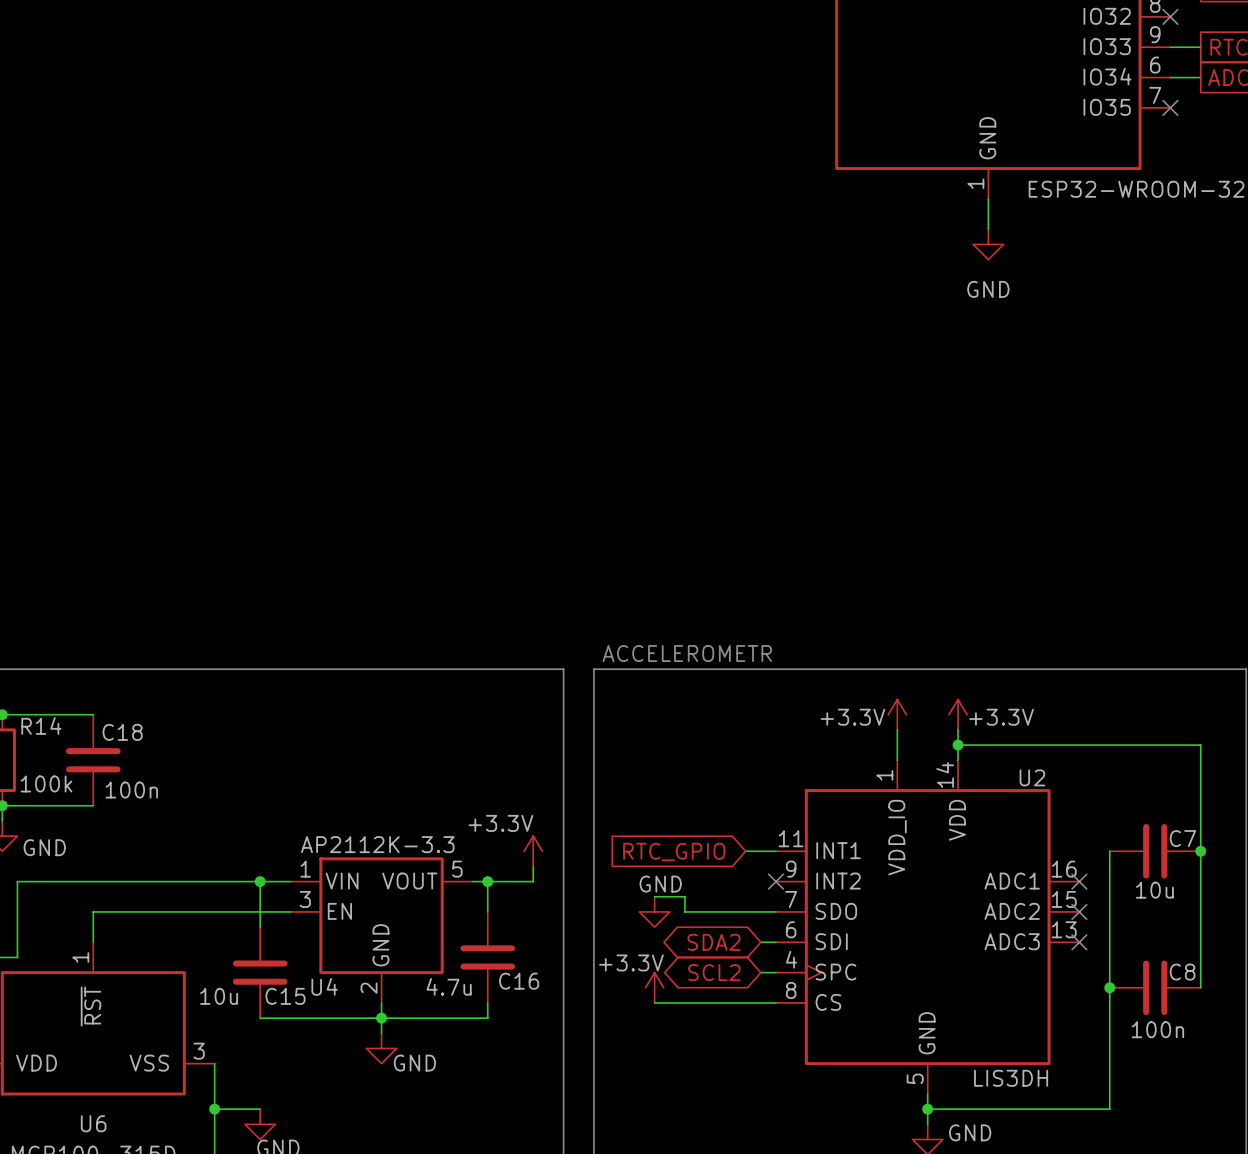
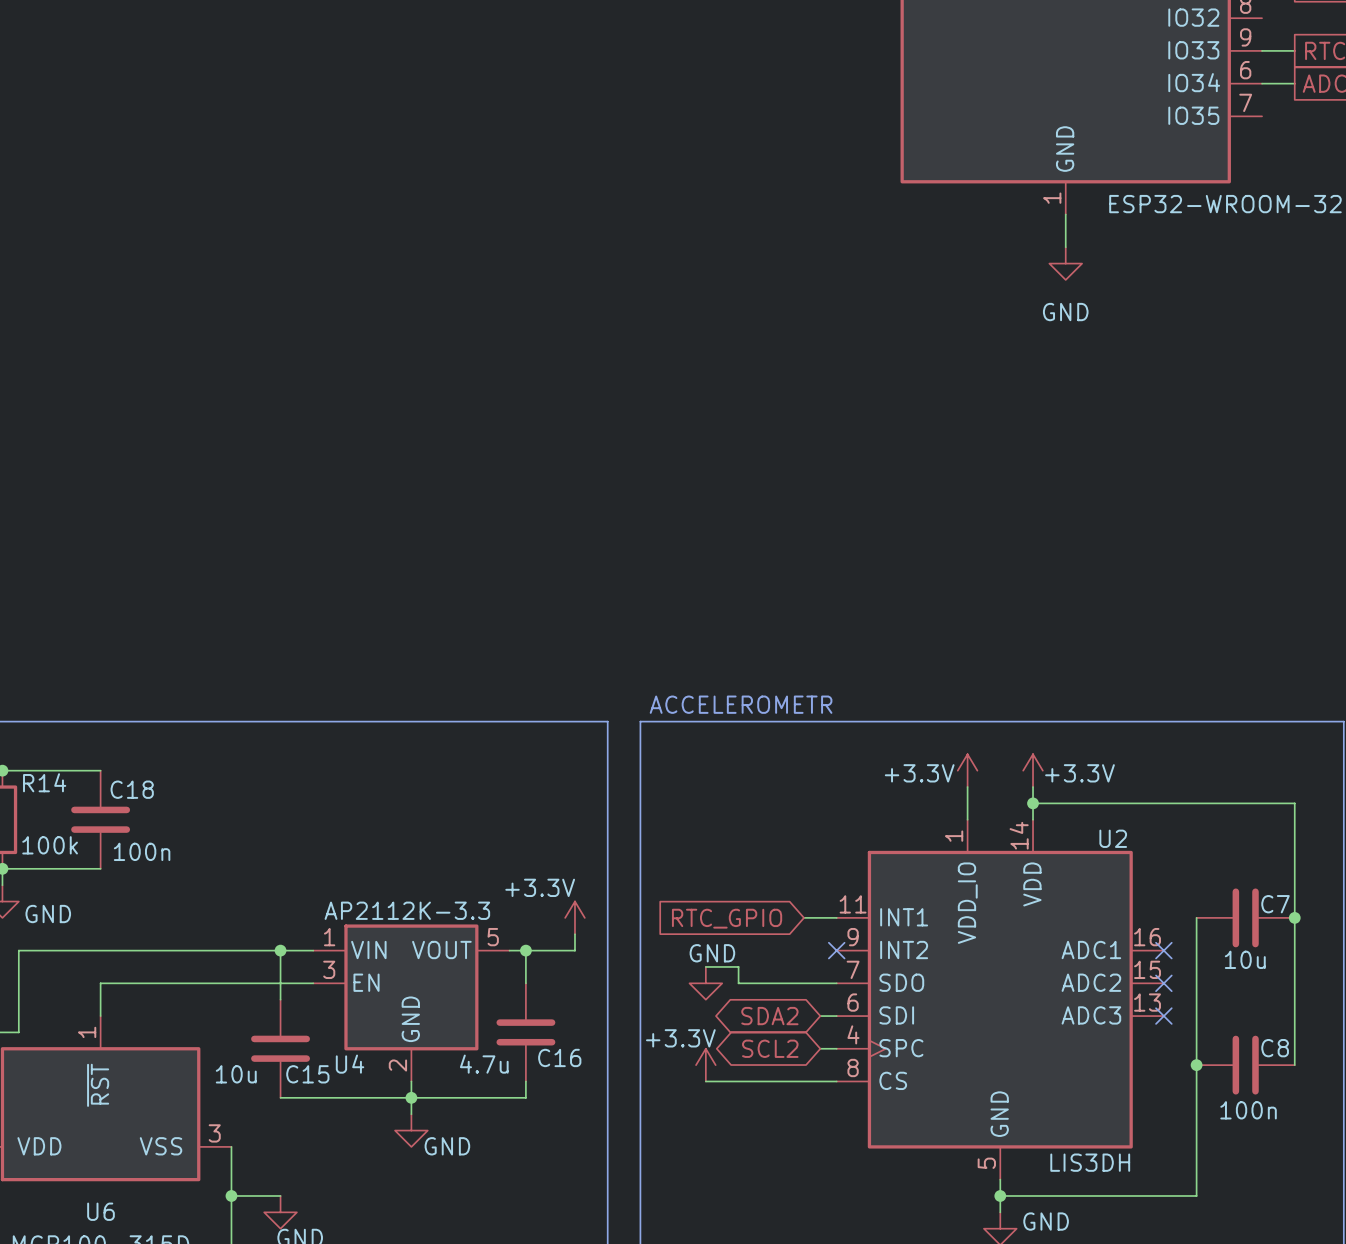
no-connect mark: (1170, 16) -> none
no-connect mark: (1170, 107) -> none

